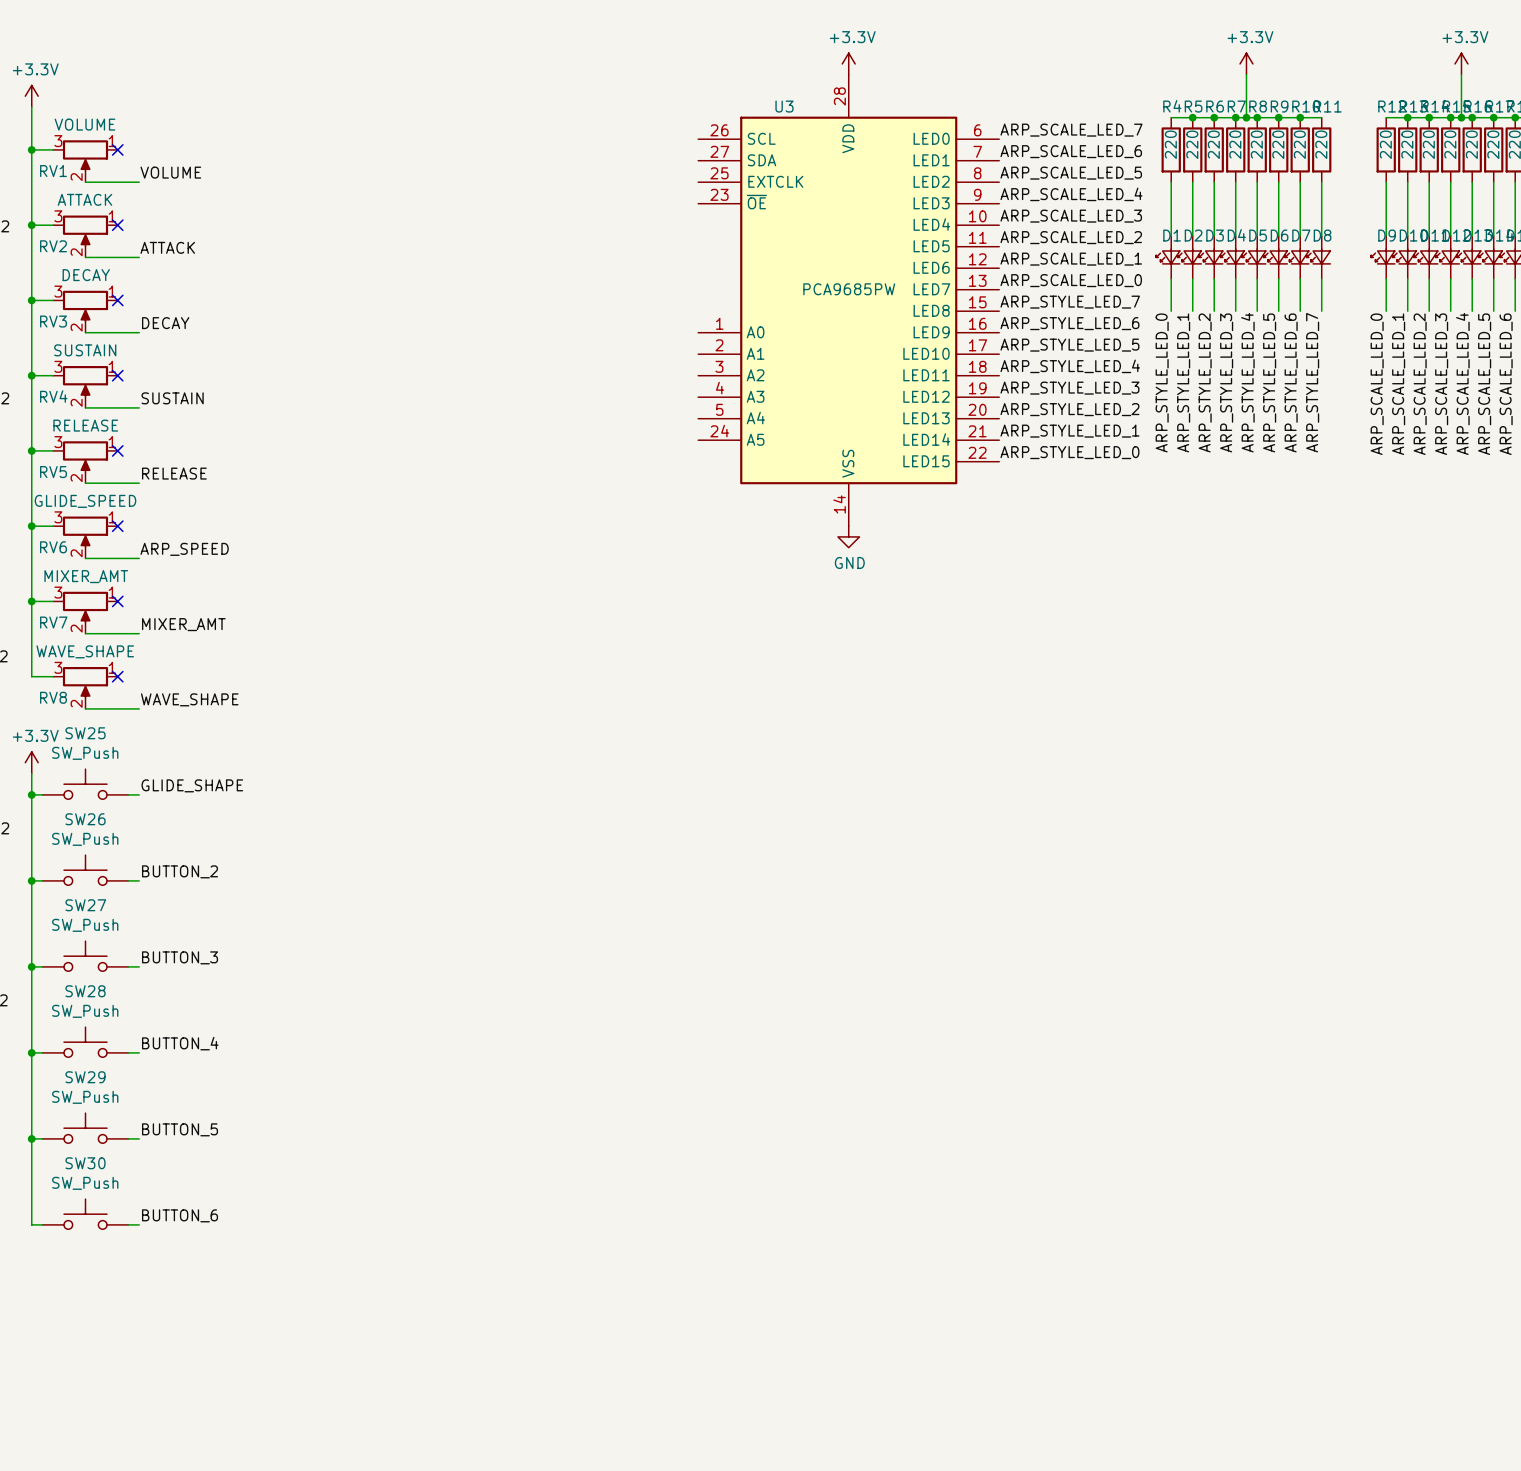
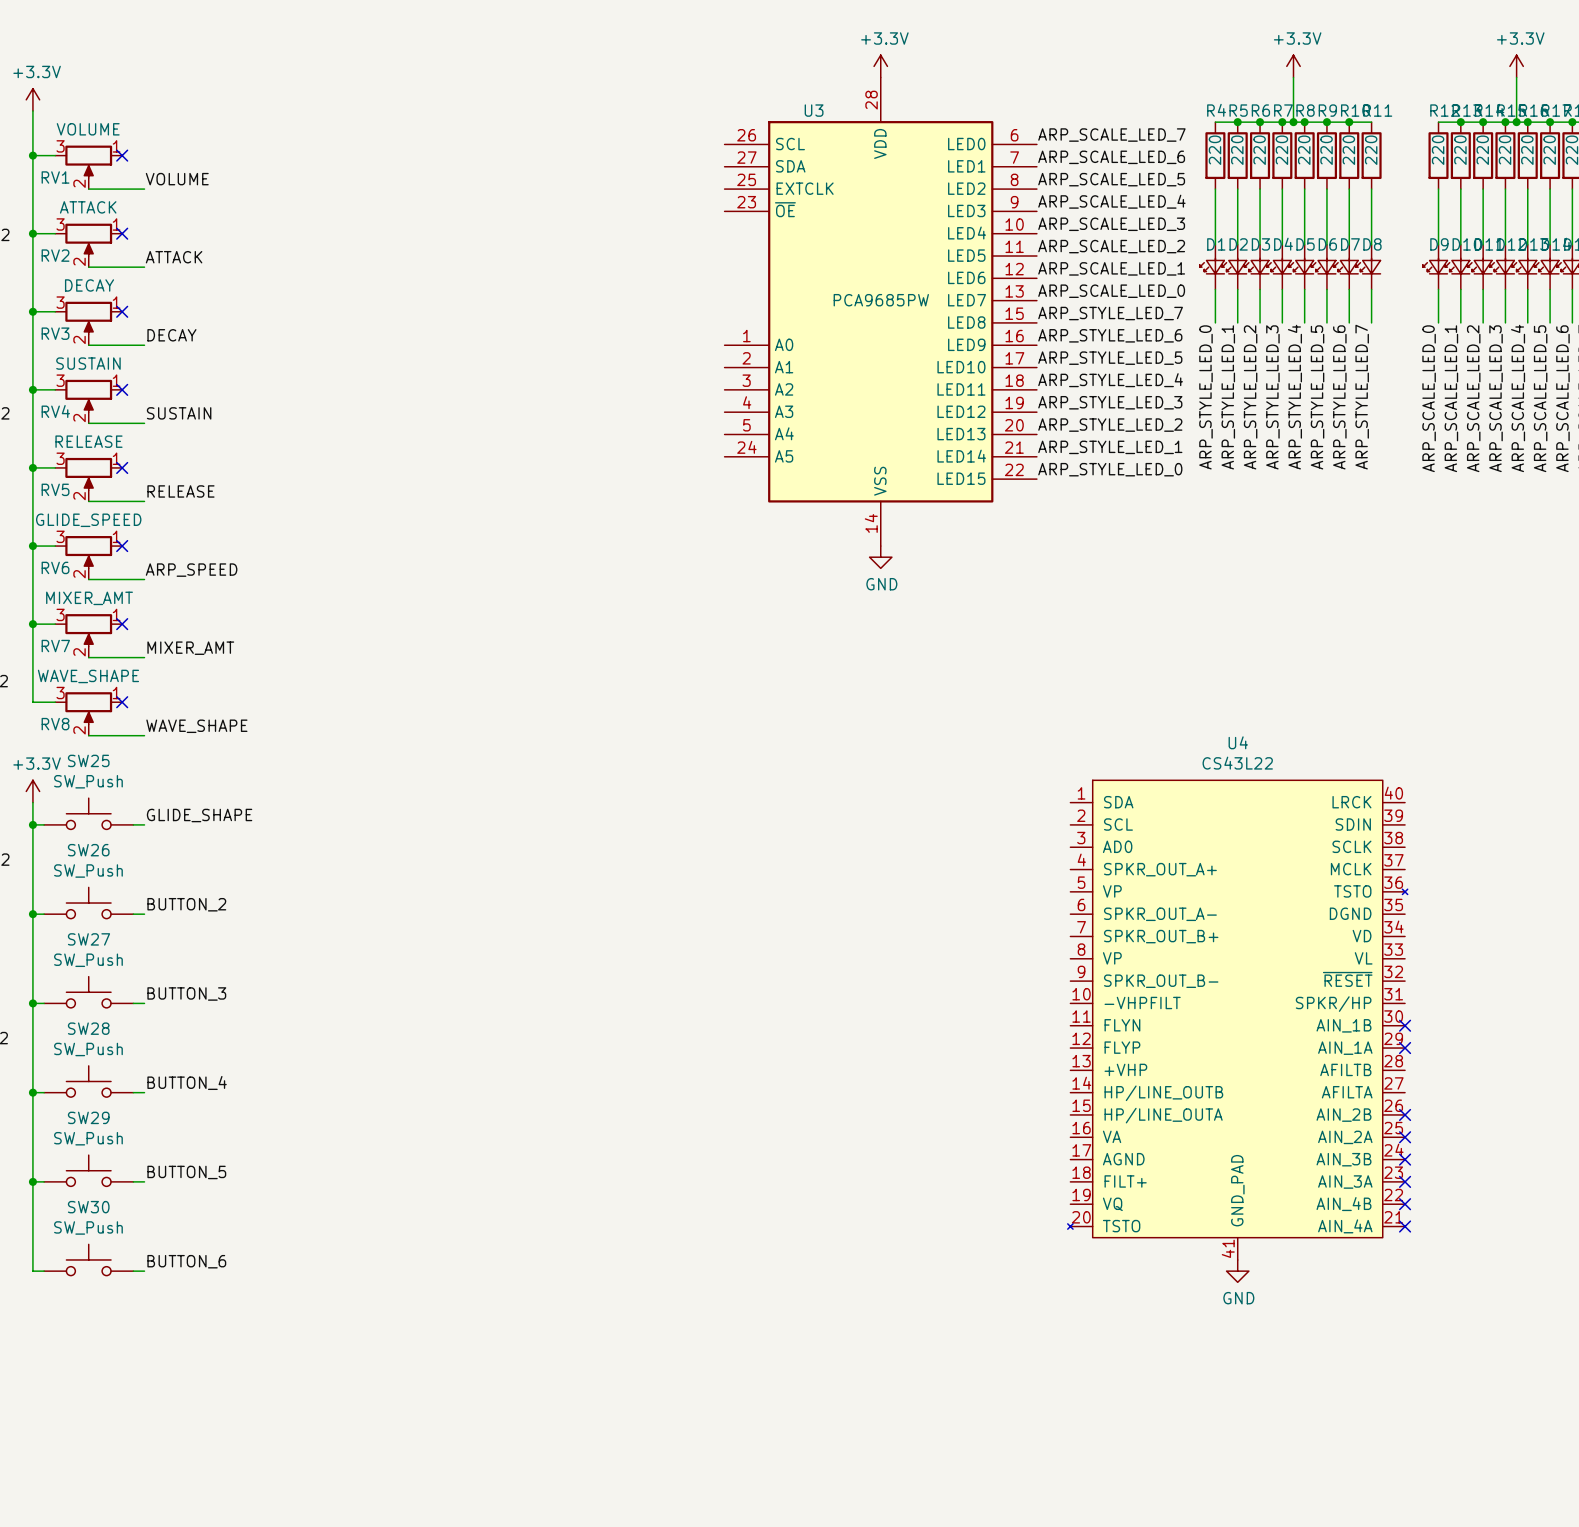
U4: none -> CS43L22 (1237, 1020)
no-connect mark: none -> (1405, 1025)
no-connect mark: none -> (1405, 1048)
no-connect mark: none -> (1405, 1114)
no-connect mark: none -> (1405, 1137)
no-connect mark: none -> (1405, 1159)
no-connect mark: none -> (1405, 1181)
no-connect mark: none -> (1405, 1204)
no-connect mark: none -> (1405, 1226)
power symbol: none -> GND (1237, 1271)

